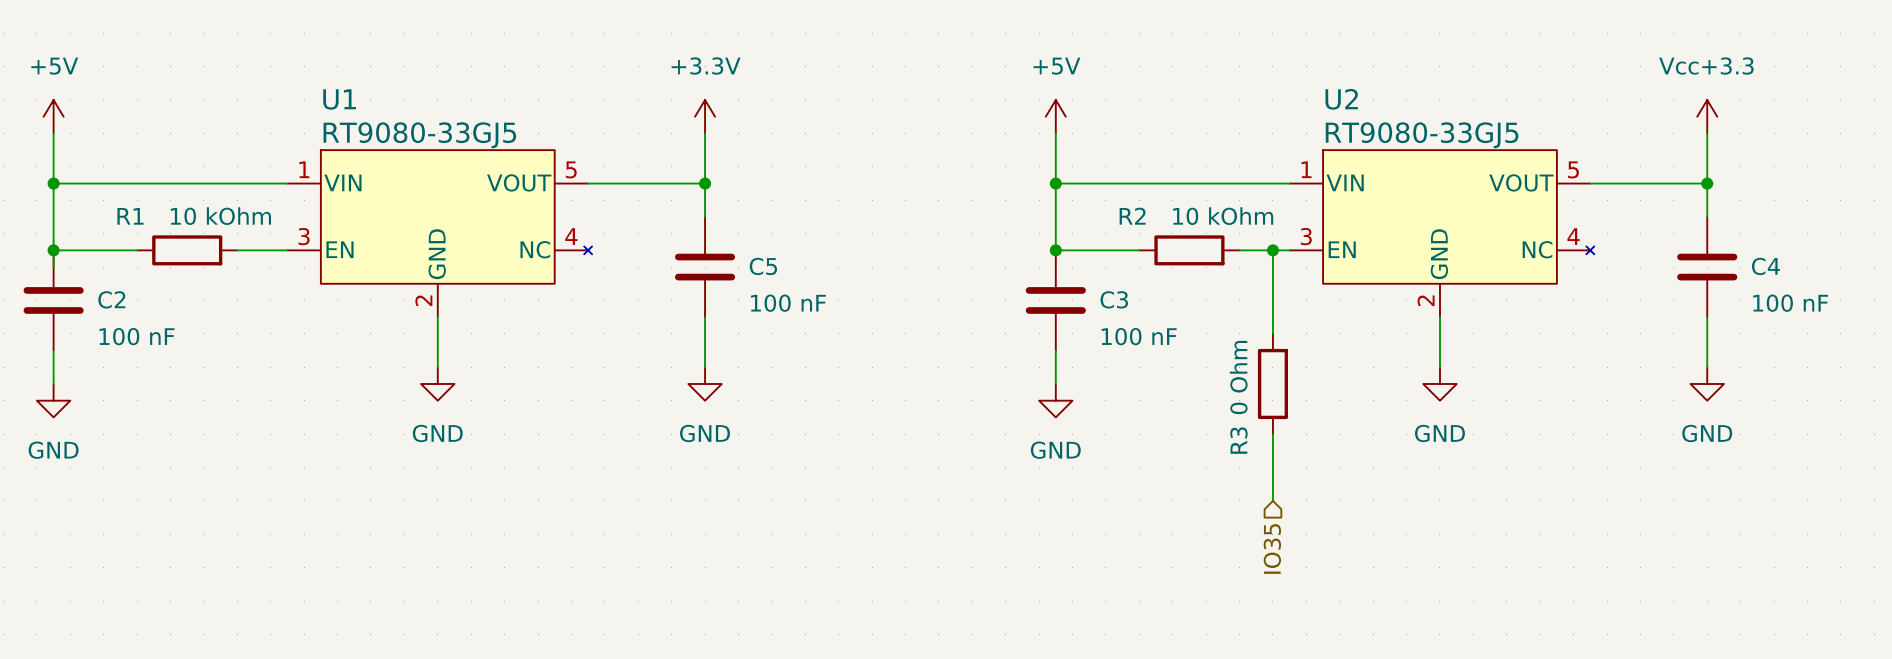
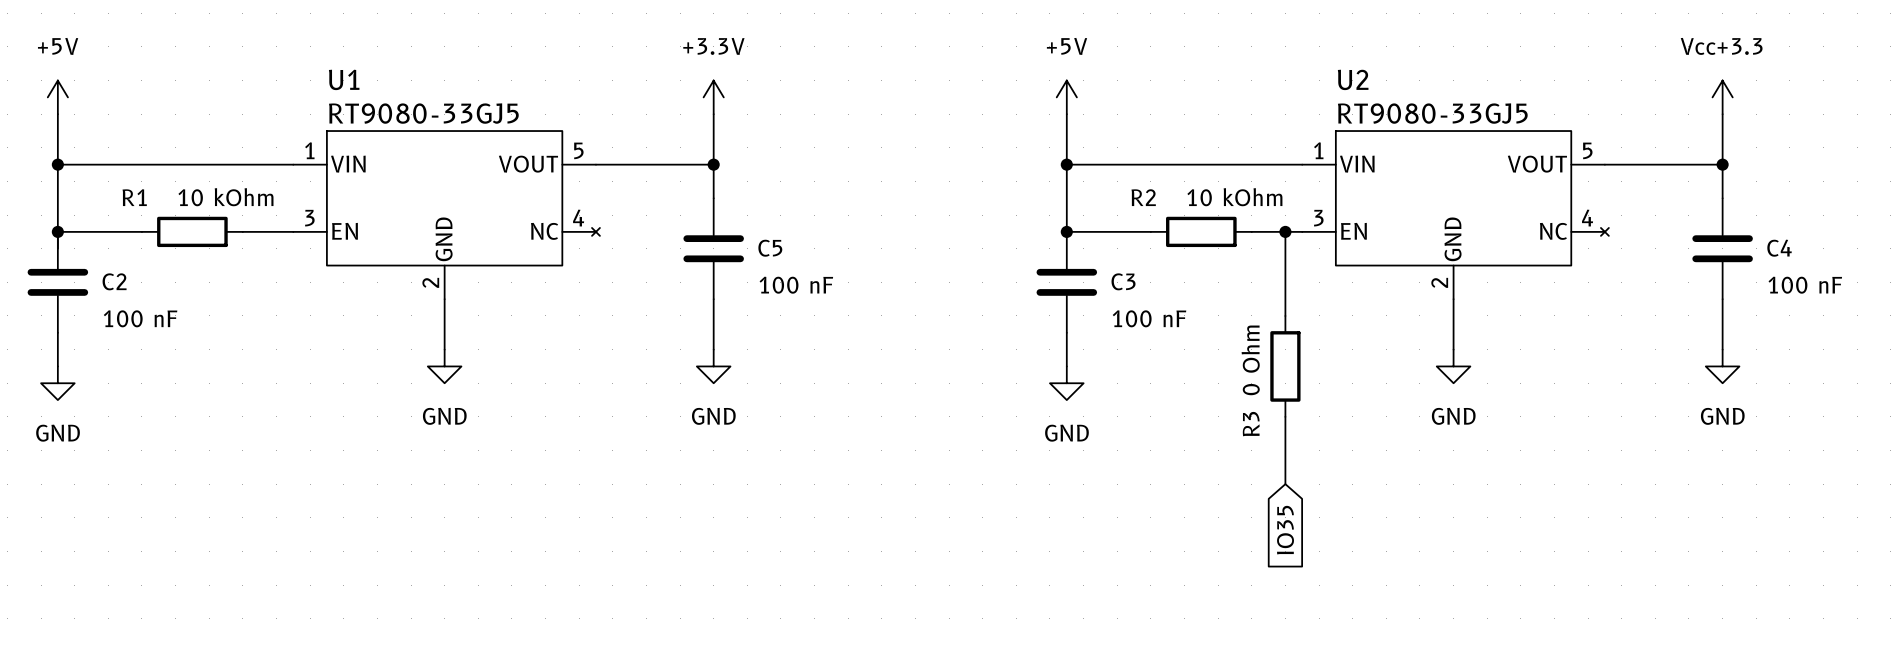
global label: none -> IO35 (1285, 530)
hierarchical label: IO35 (1272, 548) -> none

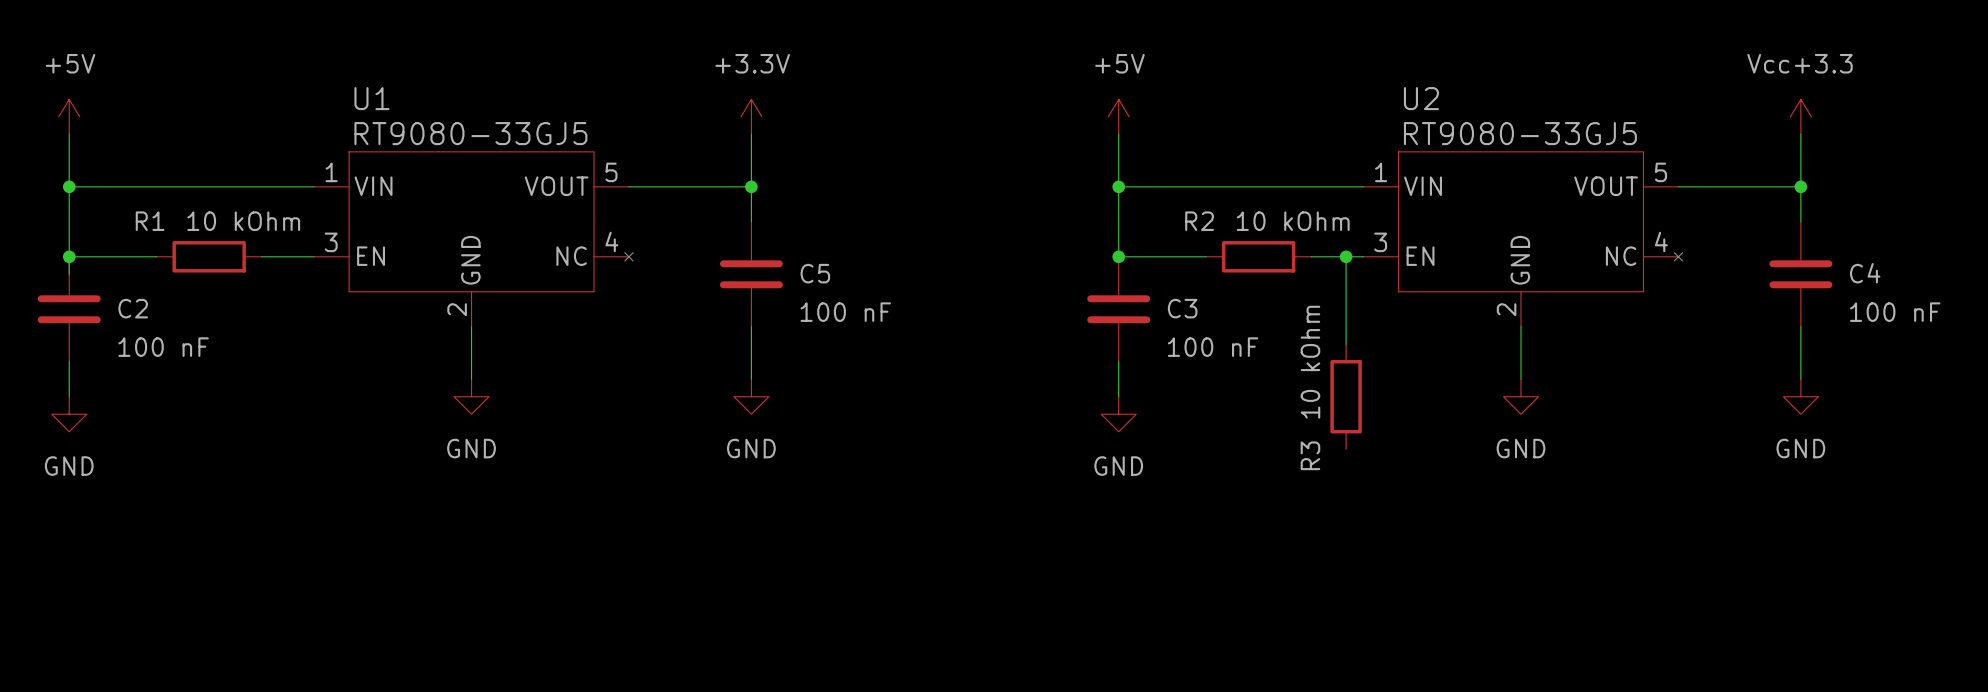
R3 value: 0 Ohm (1250, 360) -> 10 kOhm (1310, 362)
wire: (1285, 416) (1285, 484) -> none
global label: IO35 (1285, 530) -> none

